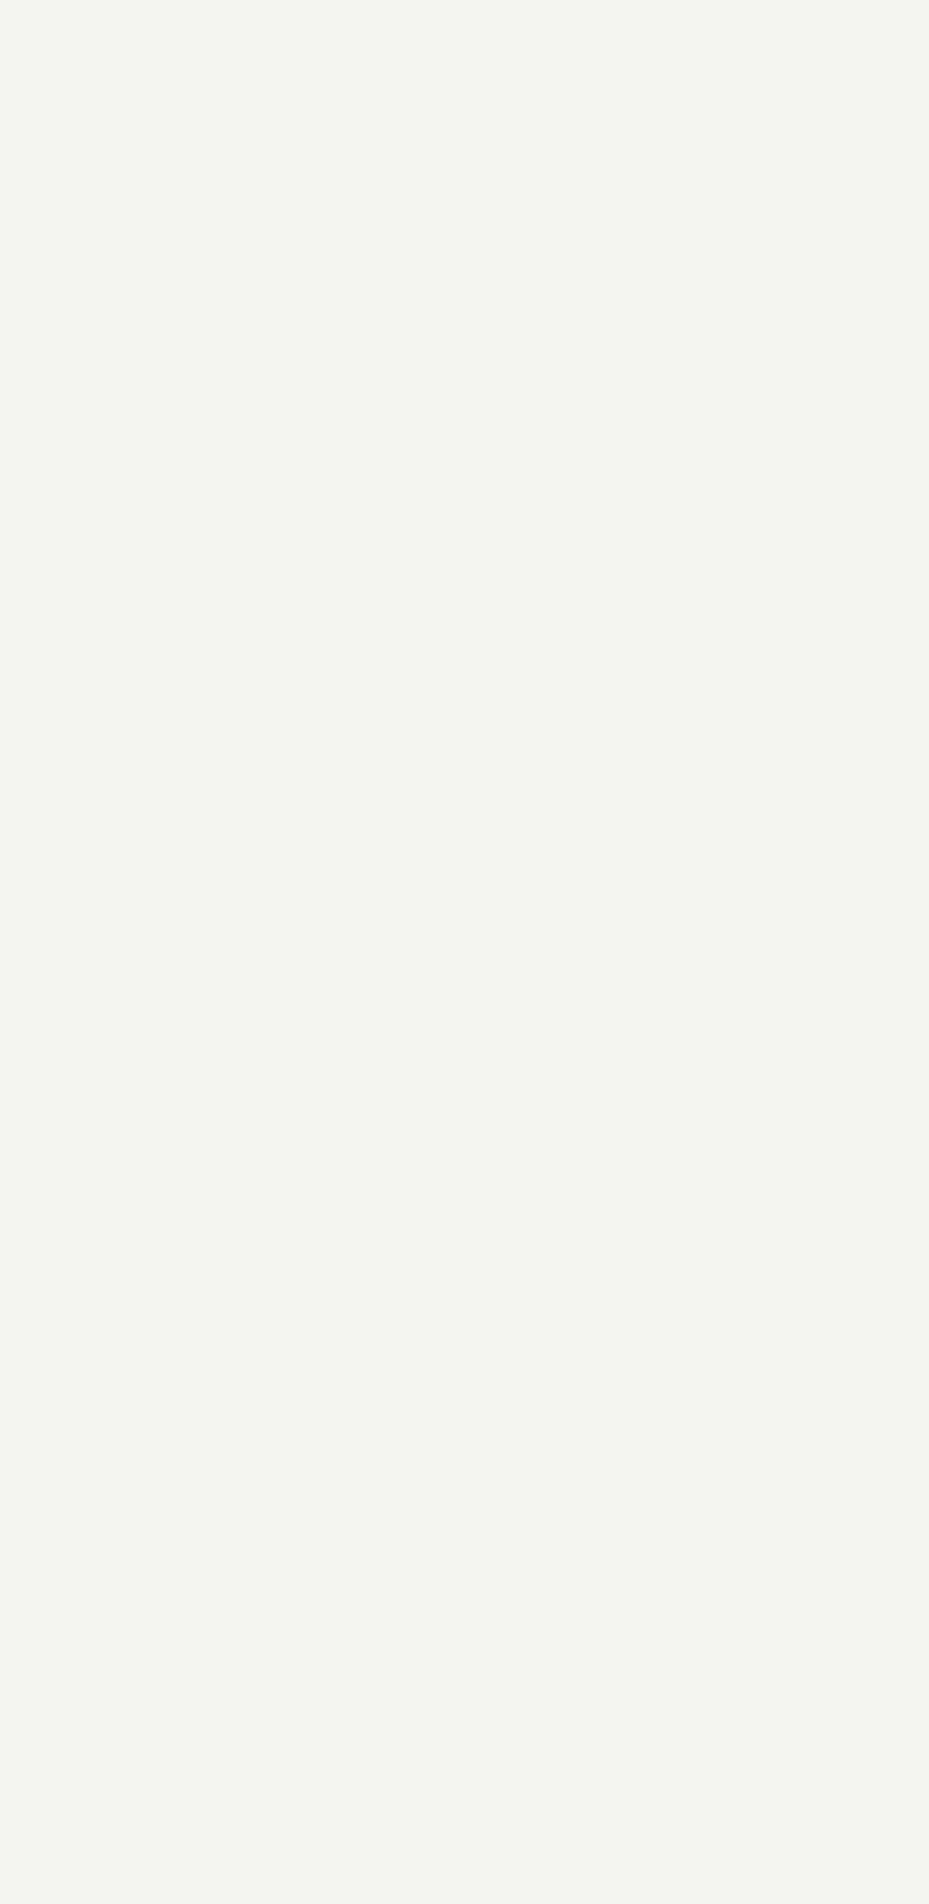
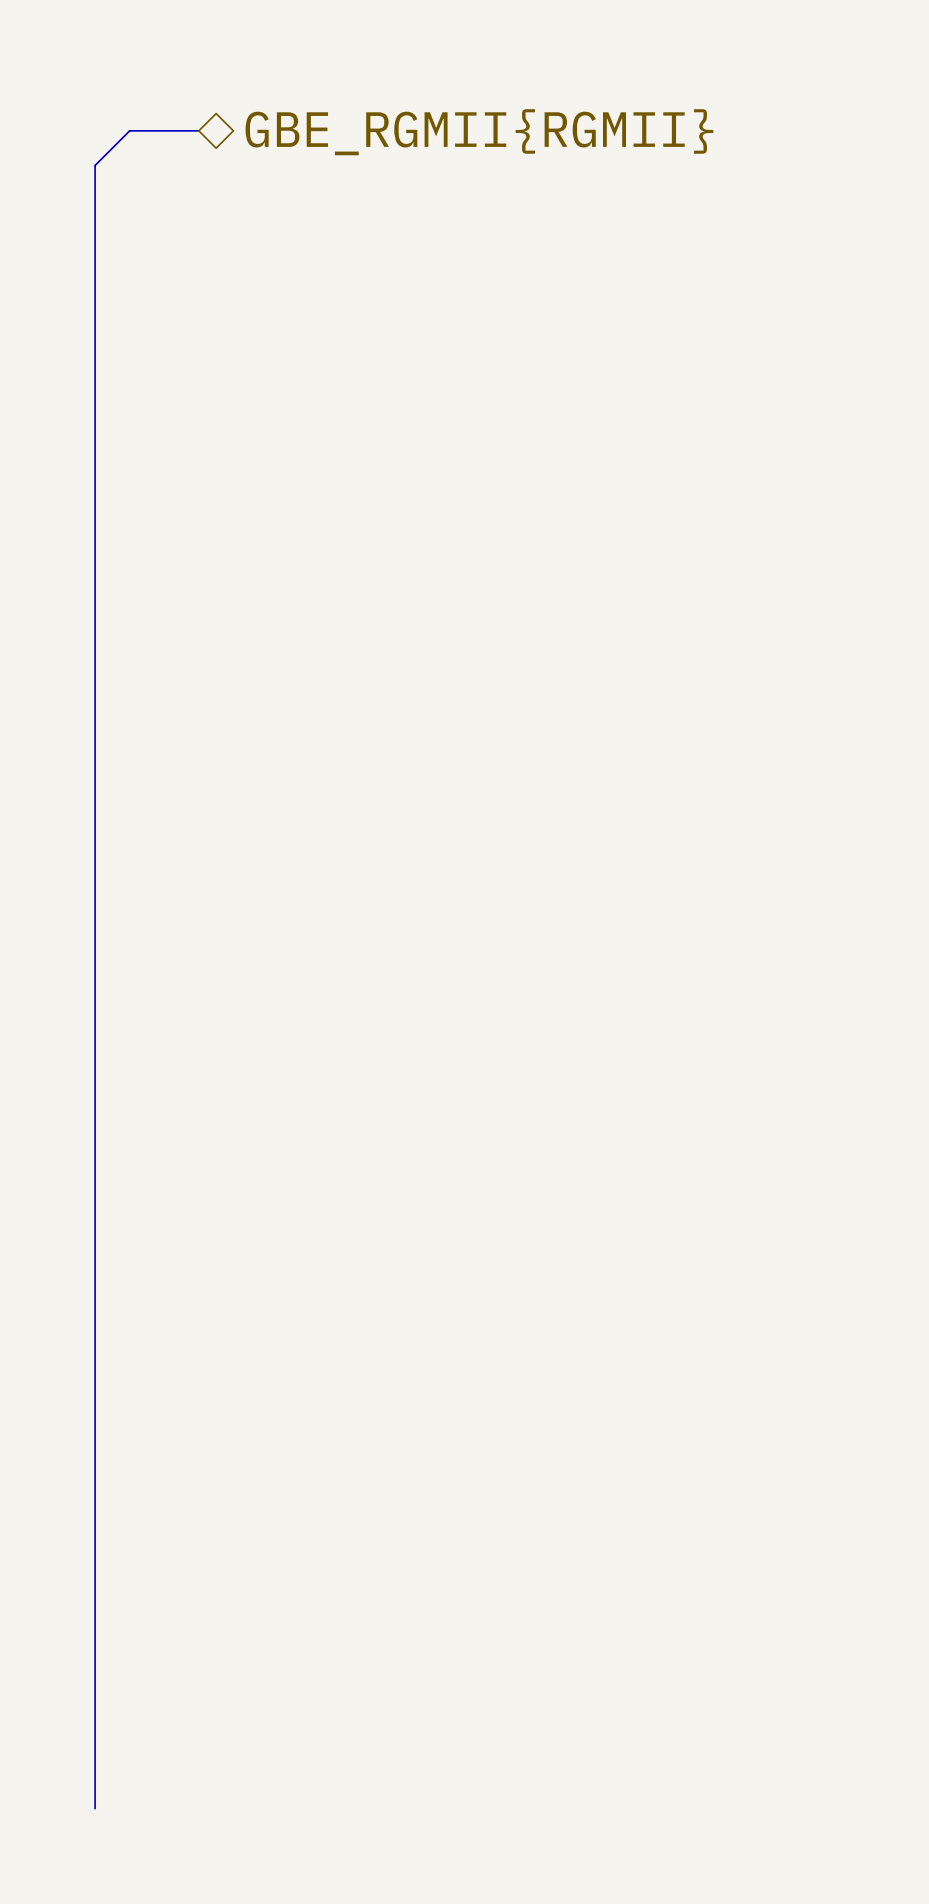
bus: none -> (198, 130) (129, 130) (95, 165) (95, 1808)
hierarchical label: none -> GBE_RGMII{RGMII} (479, 132)

